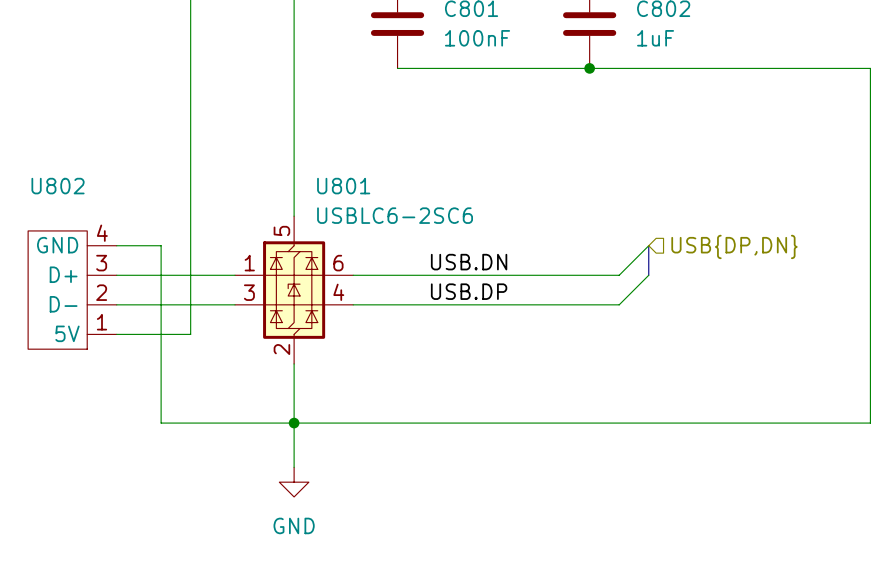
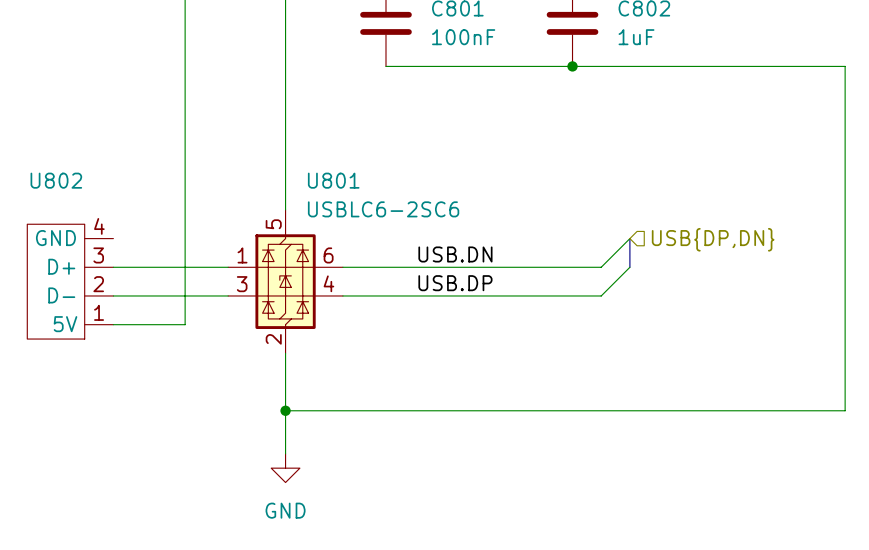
wire: (116, 245) (161, 245) (161, 423) (294, 423) -> none

